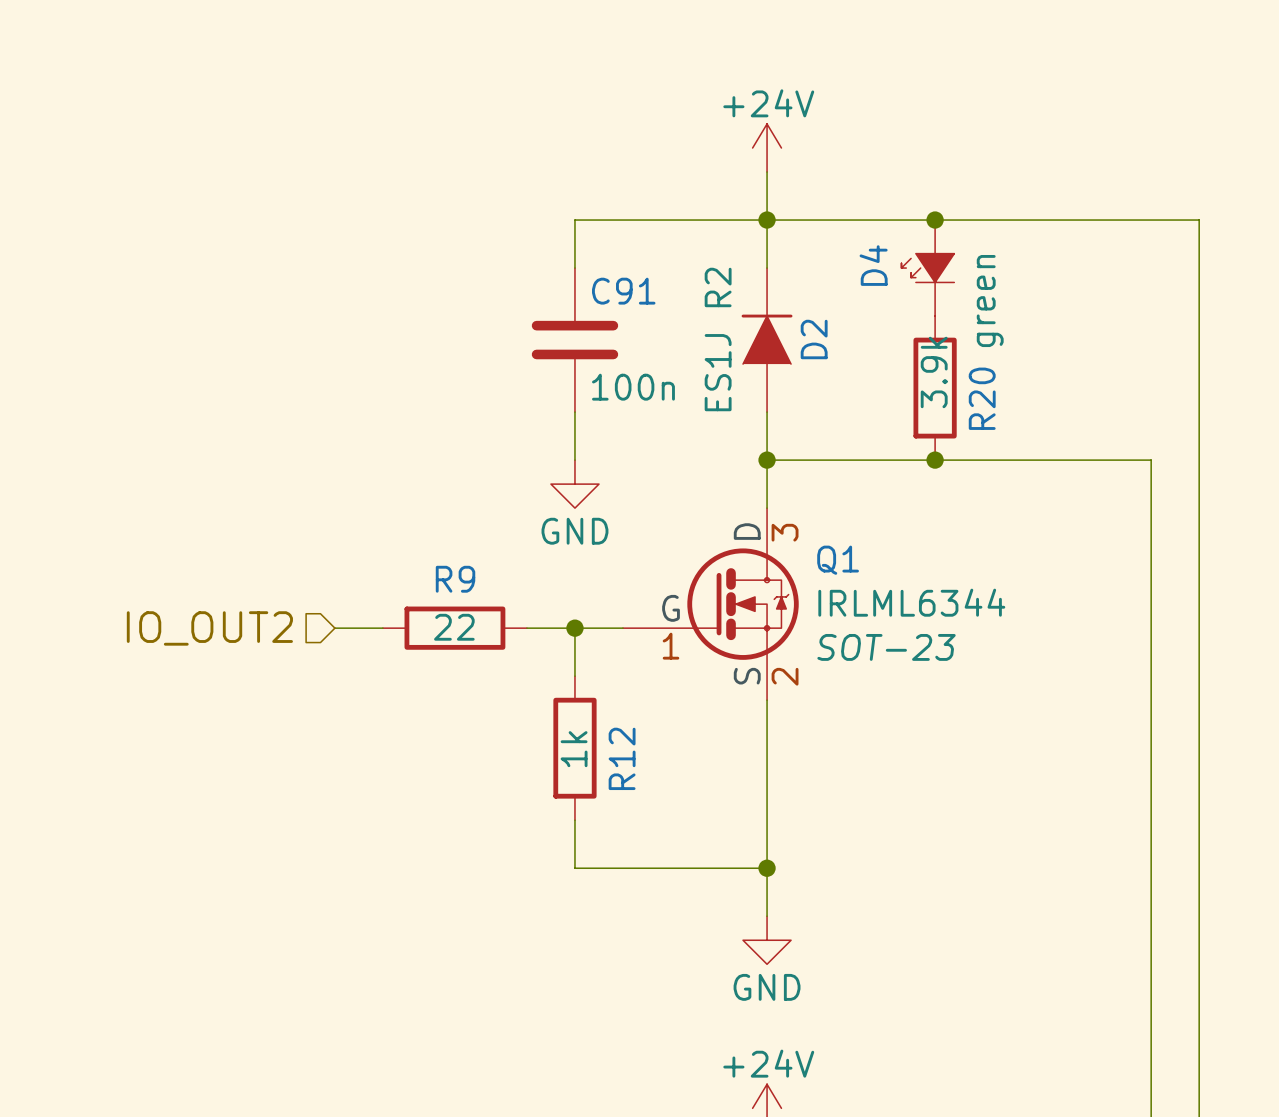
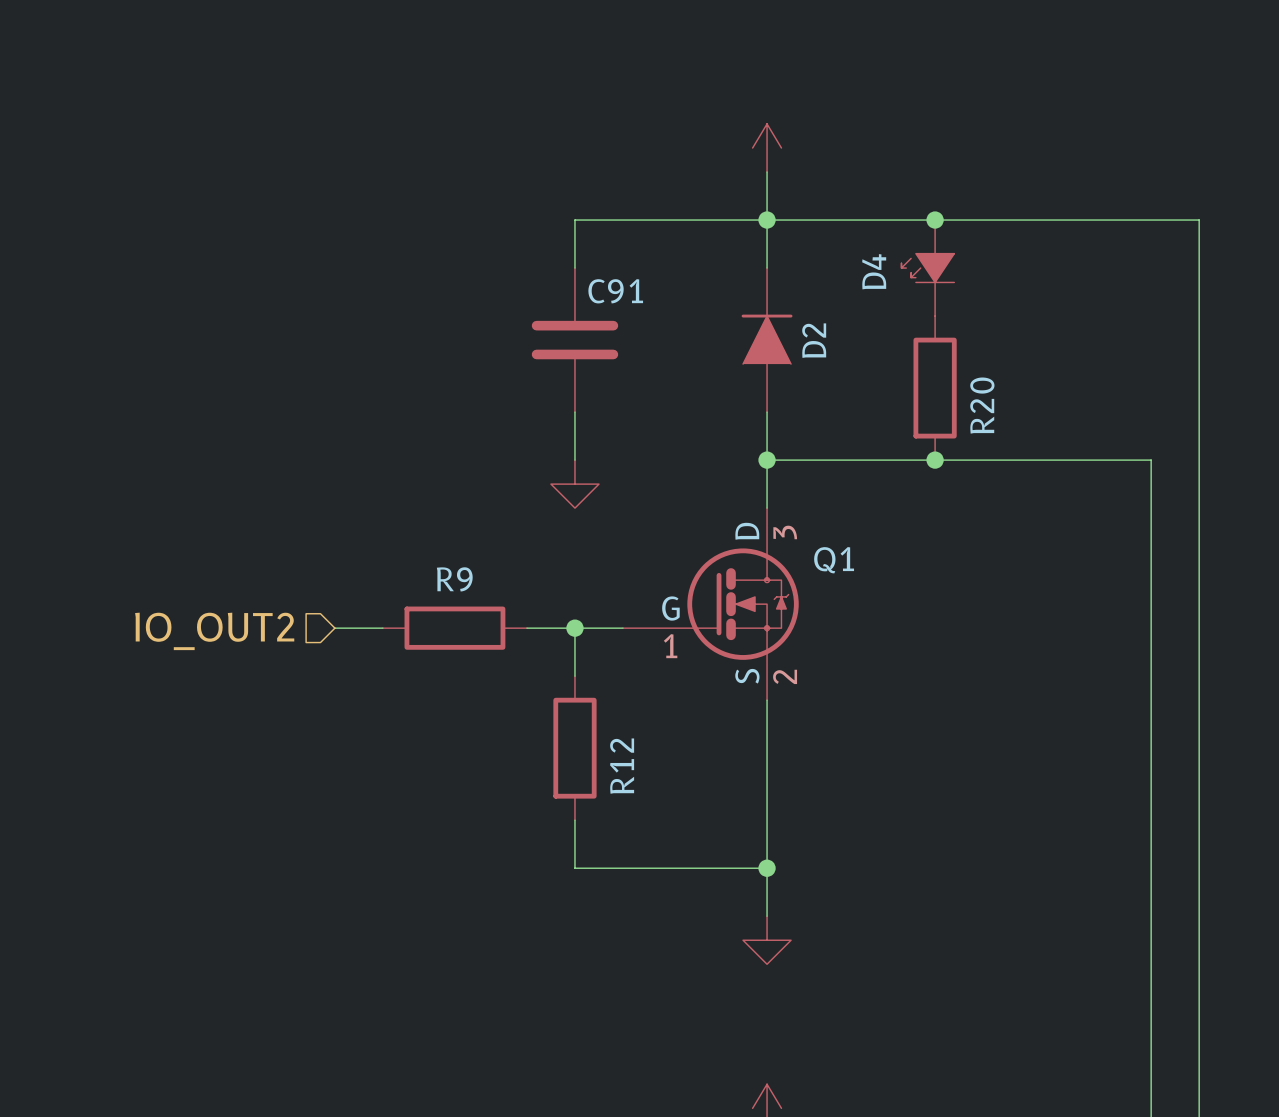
power symbol text: +24V (768, 103) -> none
D4 value: green (990, 301) -> none
D2 value: ES1J R2 (718, 339) -> none
R20 value: 3.9k (934, 372) -> none
C91 value: 100n (633, 387) -> none
power symbol text: GND (574, 531) -> none
Q1 value: IRLML6344 (911, 602) -> none
R9 value: 22 (454, 627) -> none
Q1 text: SOT-23 (886, 647) -> none
R12 value: 1k (574, 749) -> none
power symbol text: GND (767, 987) -> none
power symbol text: +24V (768, 1063) -> none

